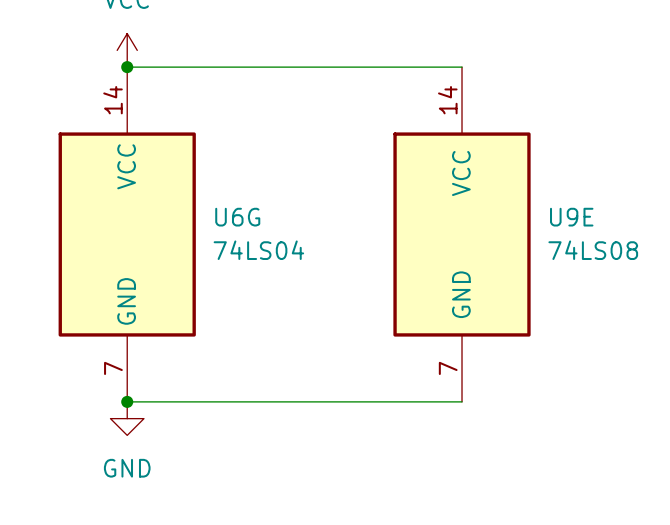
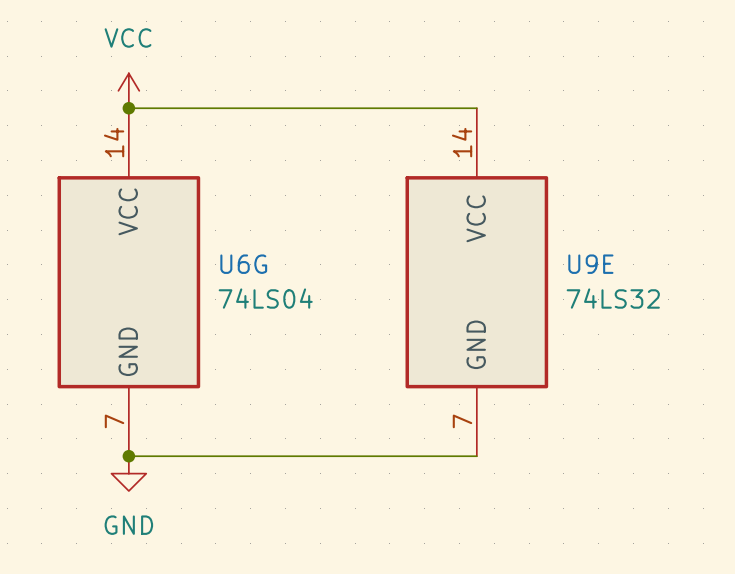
U9E value: 74LS08 (593, 250) -> 74LS32 (613, 298)

